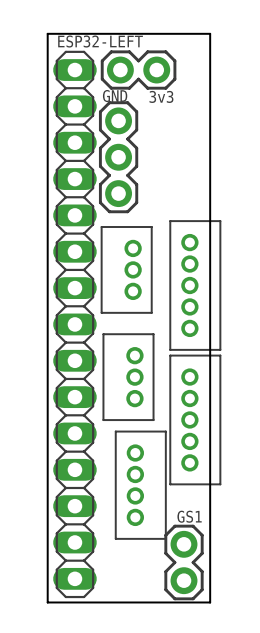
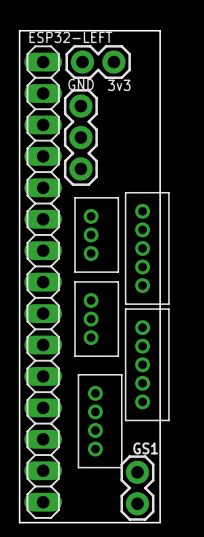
part rotation: 0° (126, 269) -> 180° (96, 234)
part rotation: 0° (128, 377) -> 180° (96, 319)

